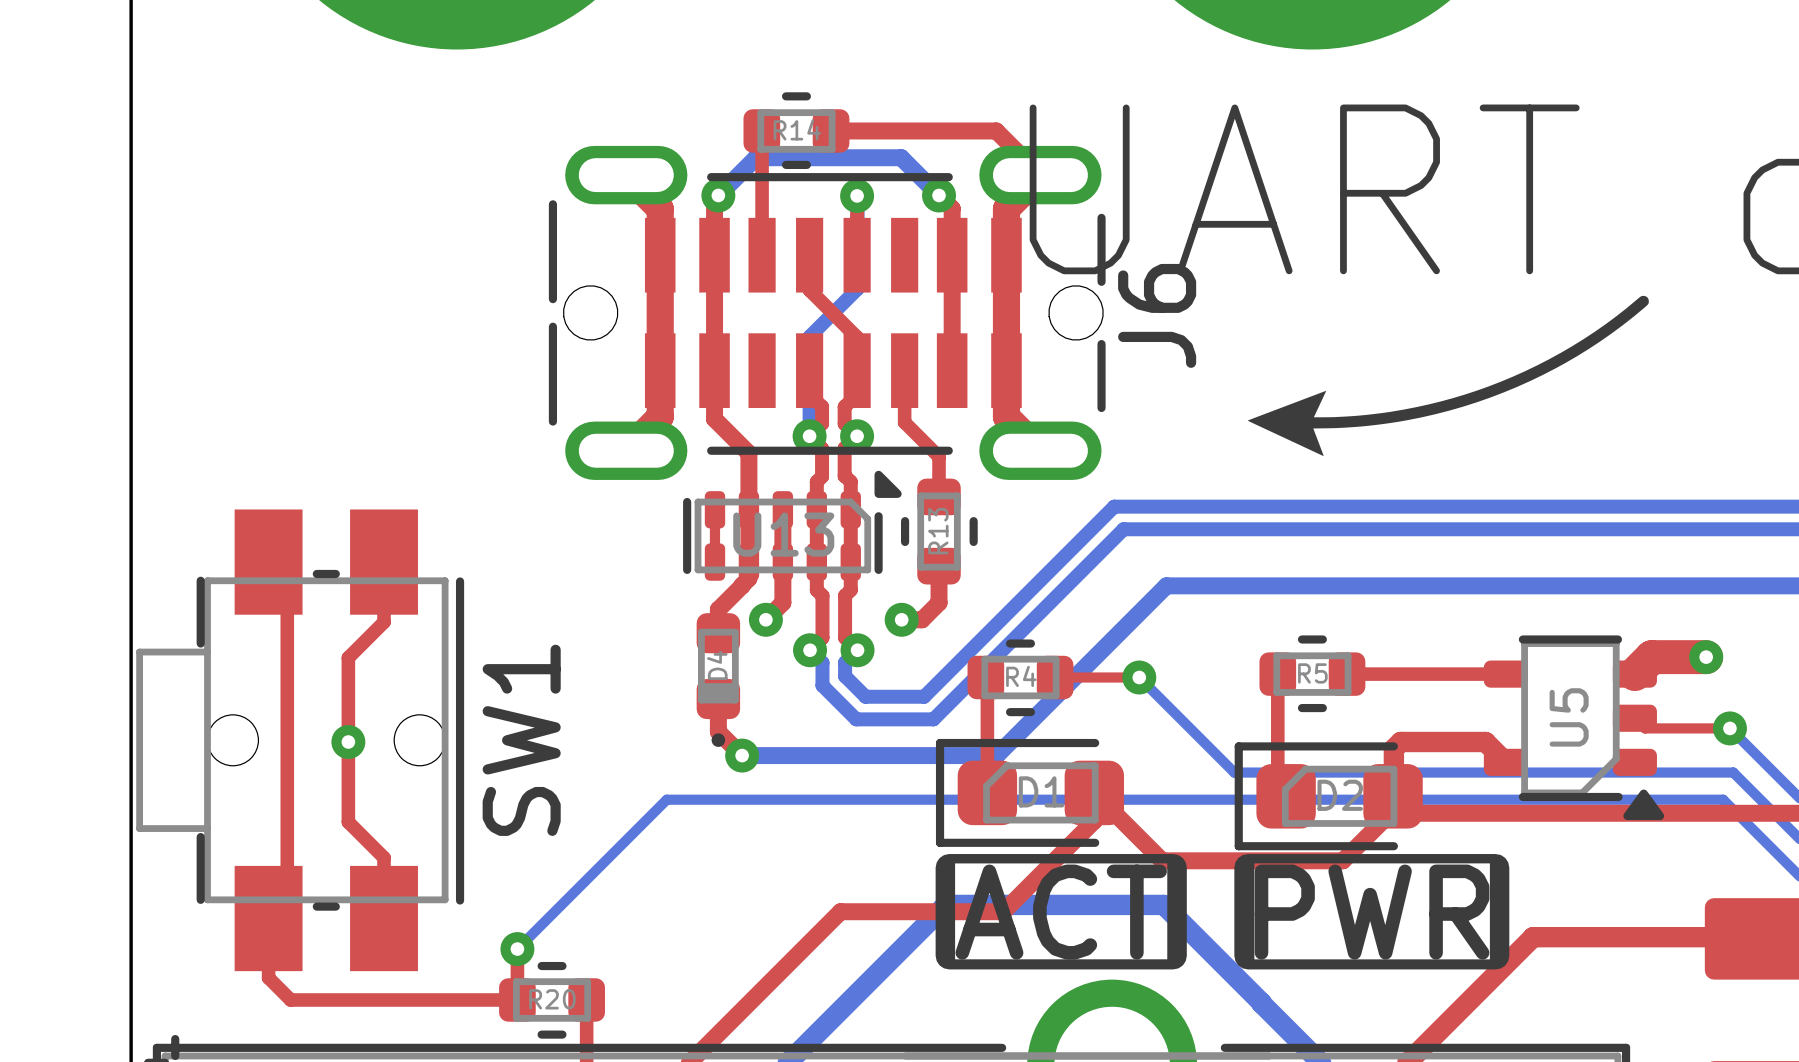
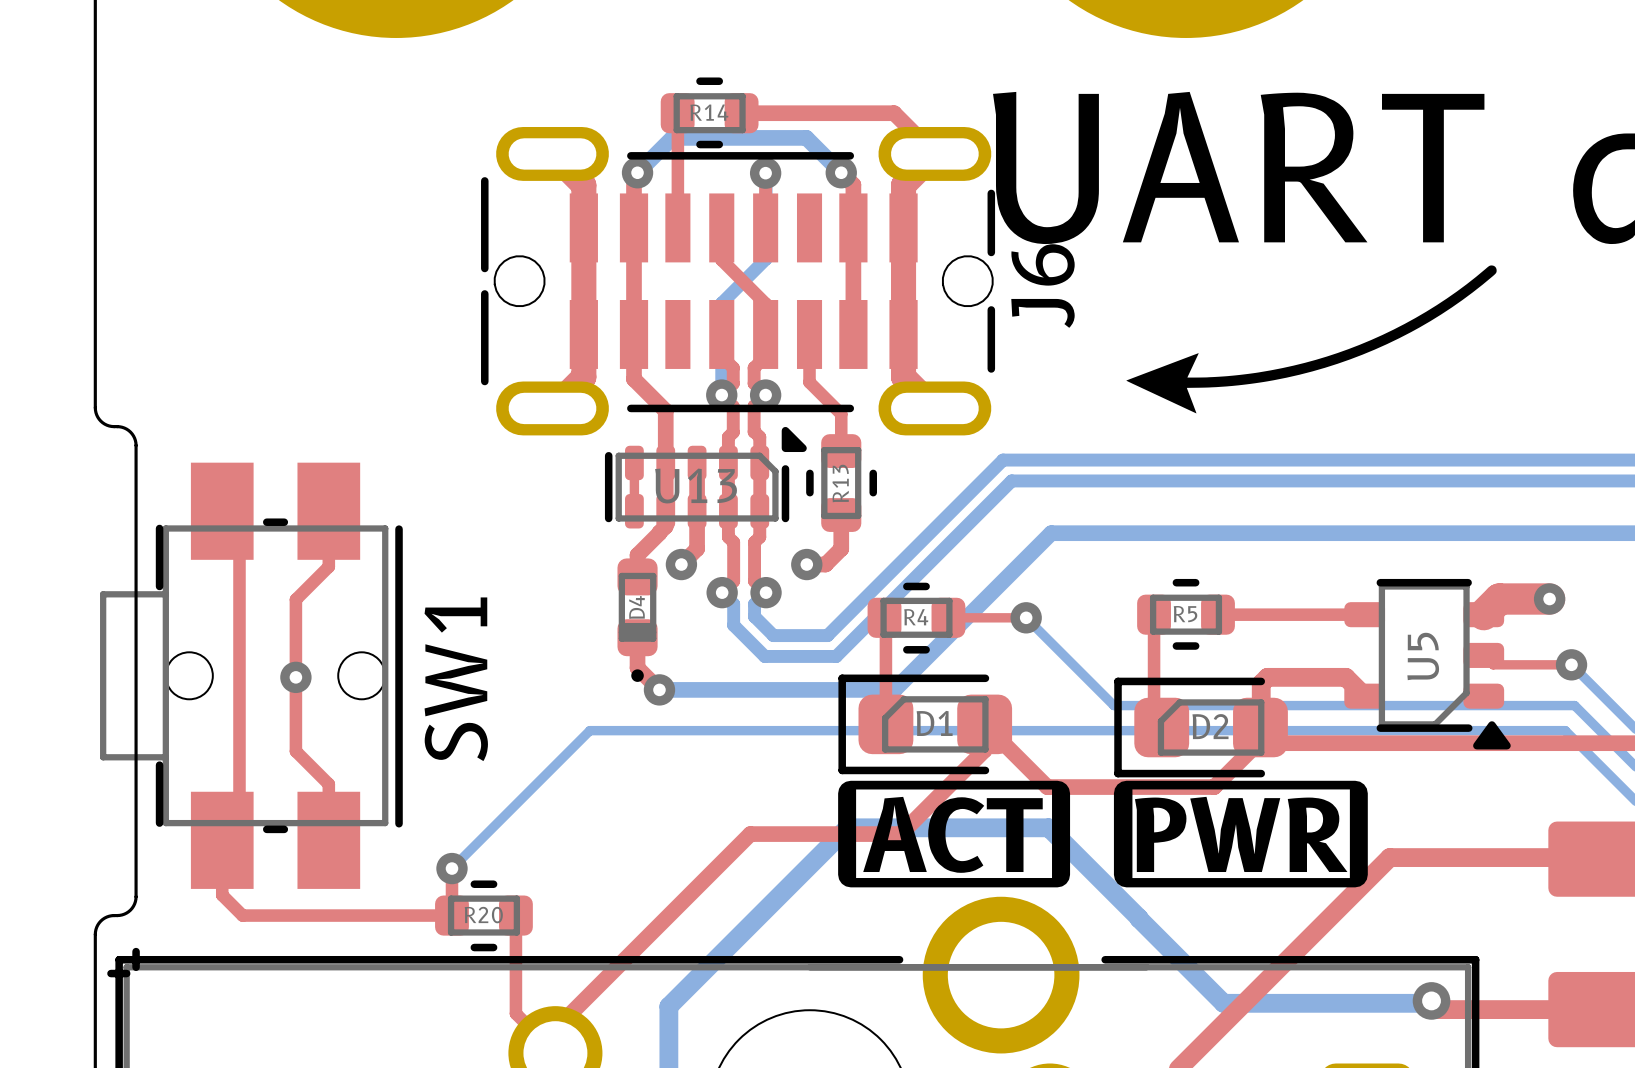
board edge: (131, 450) (131, 1020) -> (95, 407) (97, 417) (102, 422) (109, 425) (122, 427) (130, 432) (136, 445) (135, 899) (133, 906) (126, 913) (102, 919) (97, 924) (95, 934)

